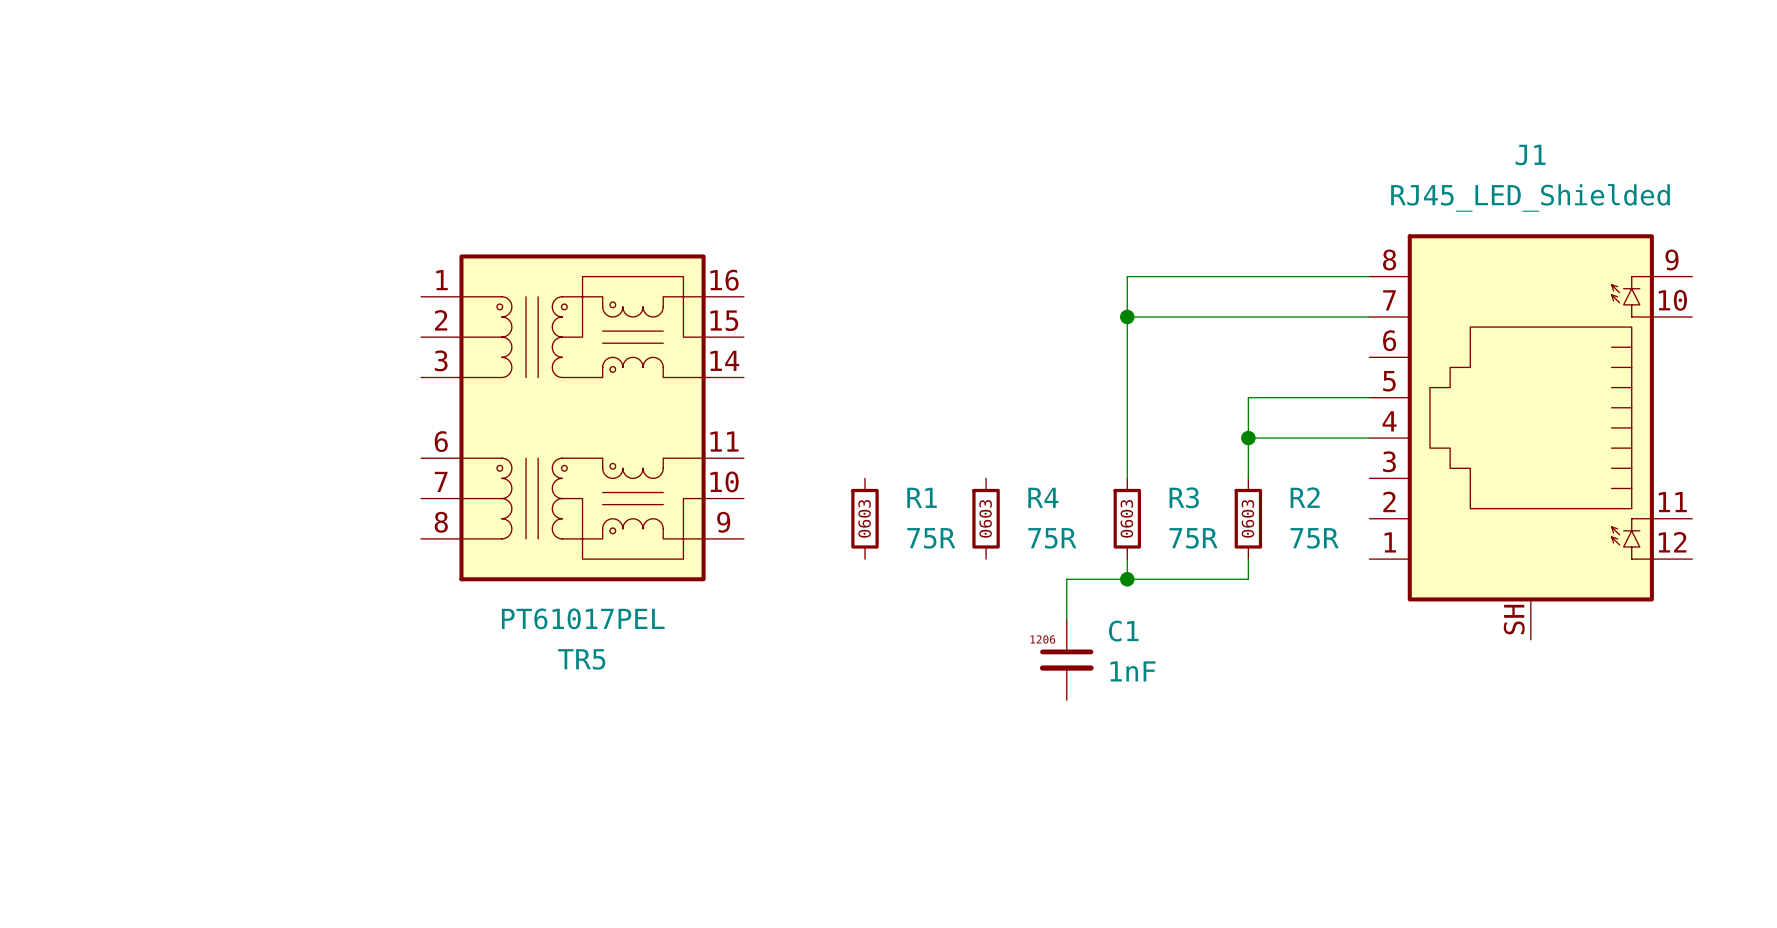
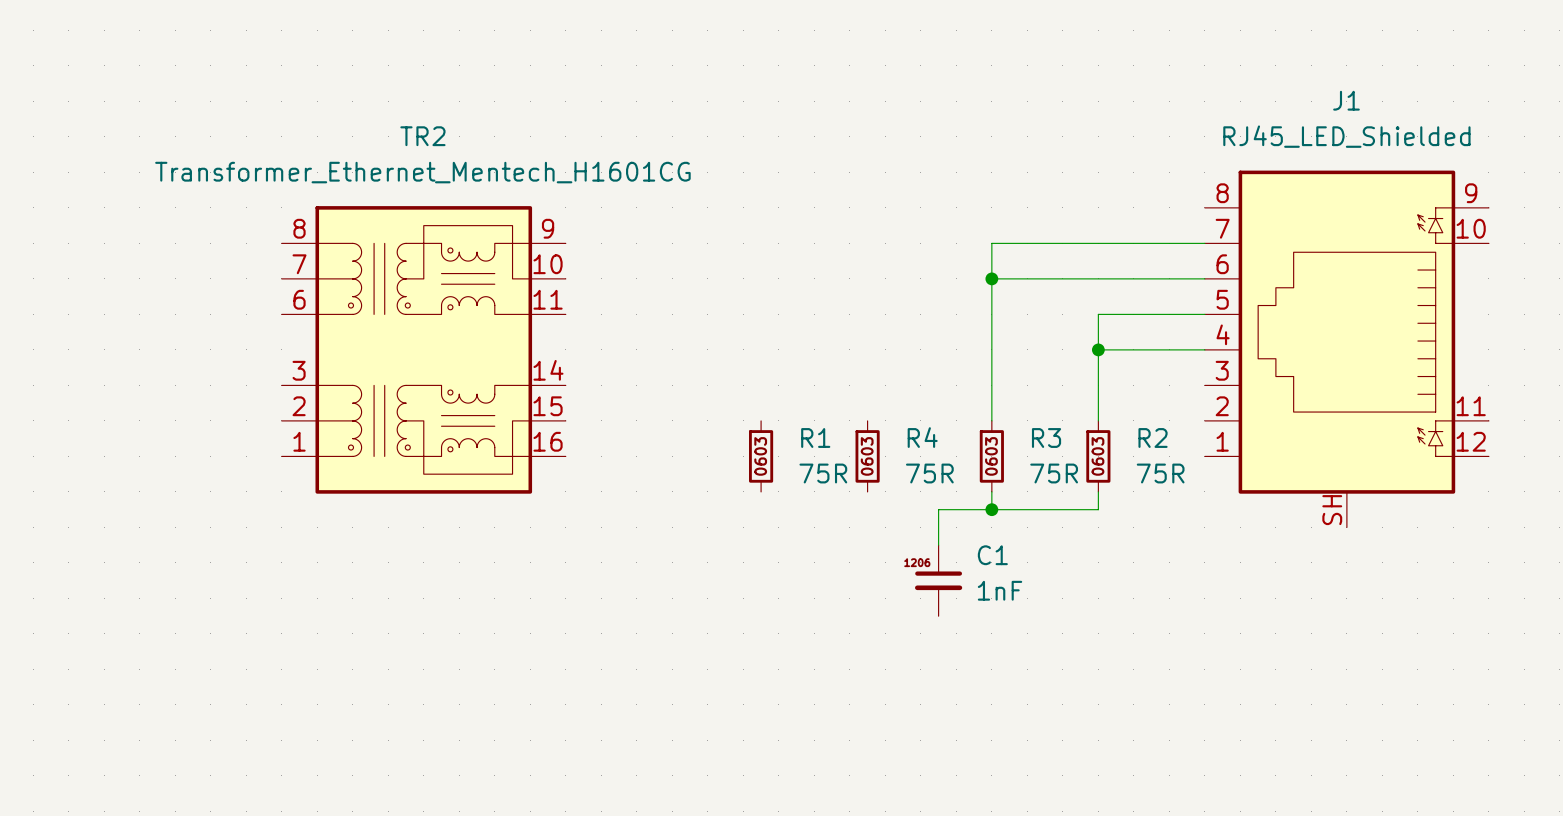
wire: none -> (1204, 314) (1098, 314) (1098, 349)
TR2: none -> Transformer_Ethernet_Mentech_H1601CG (423, 349)
TR5: PT61017PEL (582, 417) -> none
J1 position: (1530, 437) -> (1346, 349)
wire: (1248, 438) (1369, 438) -> none
junction position: (1248, 438) -> (1098, 349)

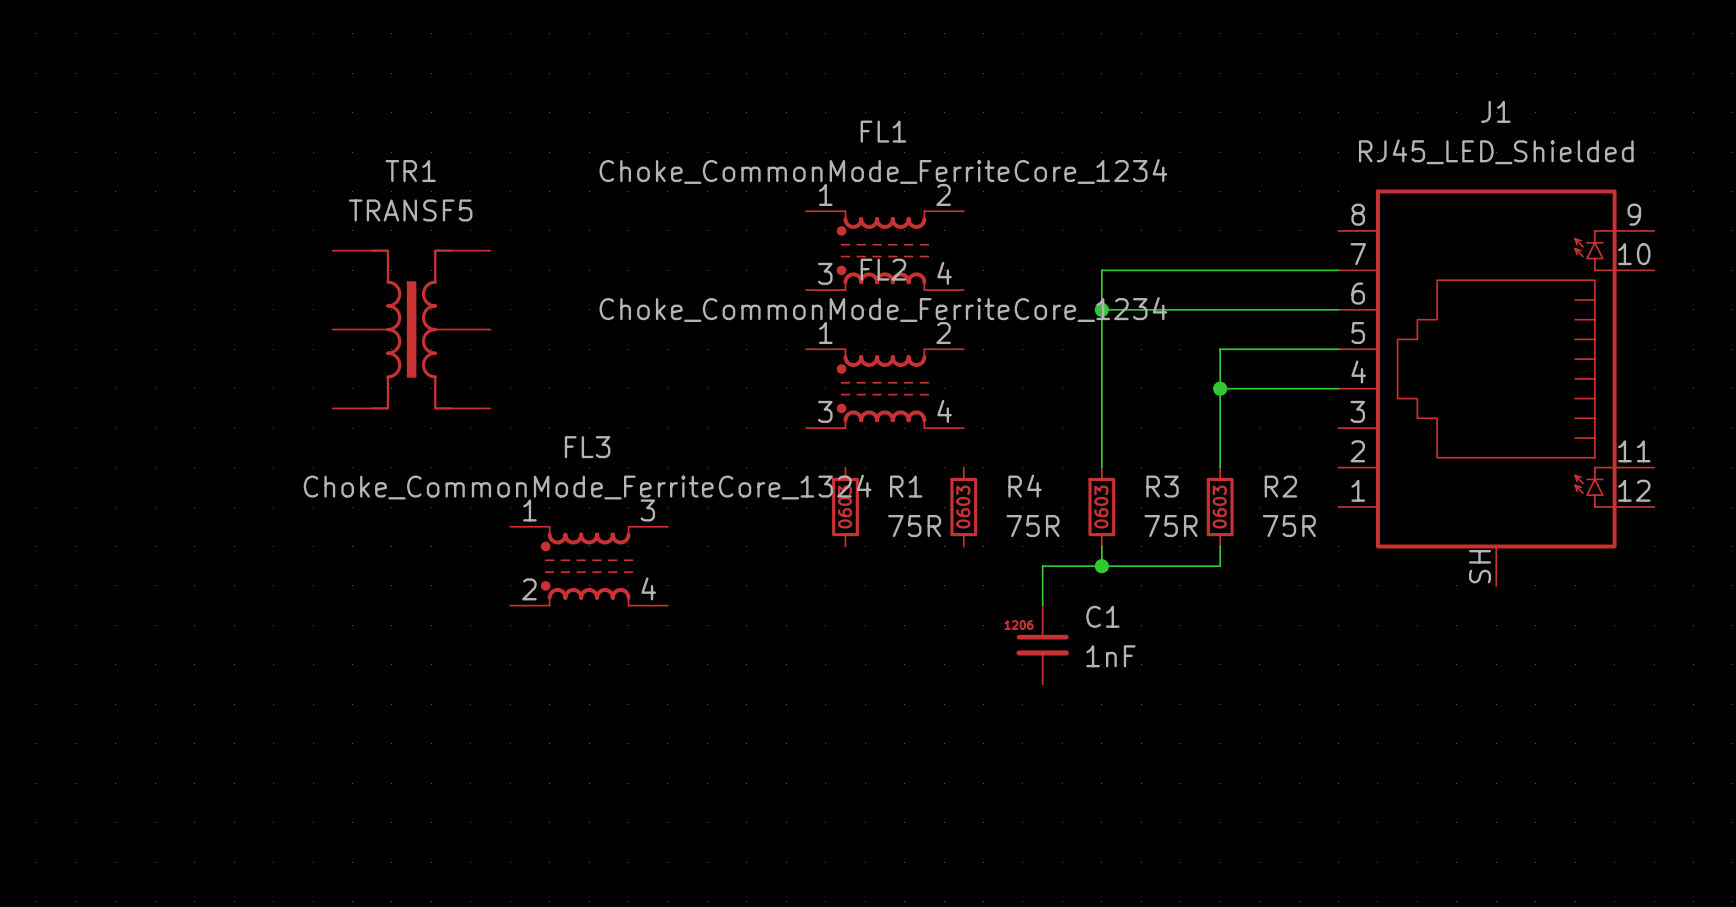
FL1: none -> Choke_CommonMode_FerriteCore_1234 (884, 250)
TR1: none -> TRANSF5 (411, 329)
TR2: Transformer_Ethernet_Mentech_H1601CG (423, 349) -> none
FL2: none -> Choke_CommonMode_FerriteCore_1234 (884, 388)
FL3: none -> Choke_CommonMode_FerriteCore_1324 (589, 566)

